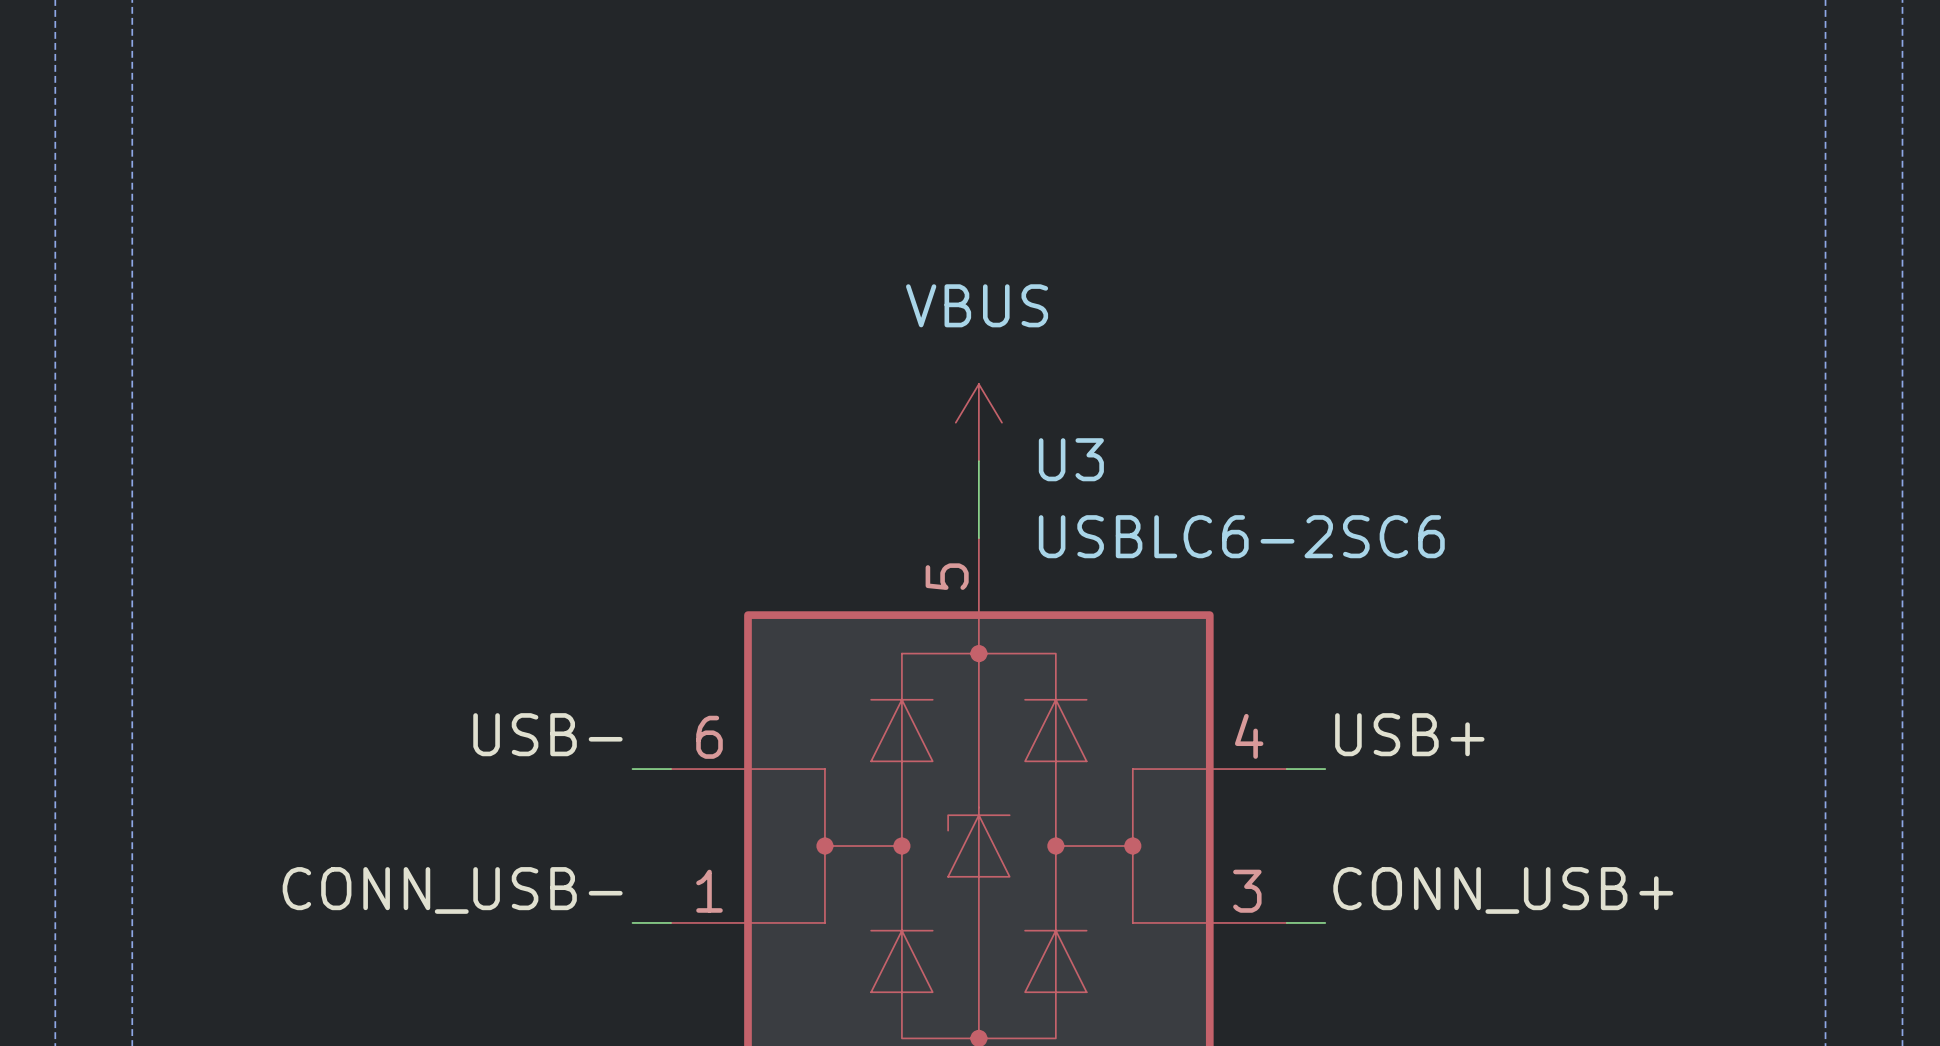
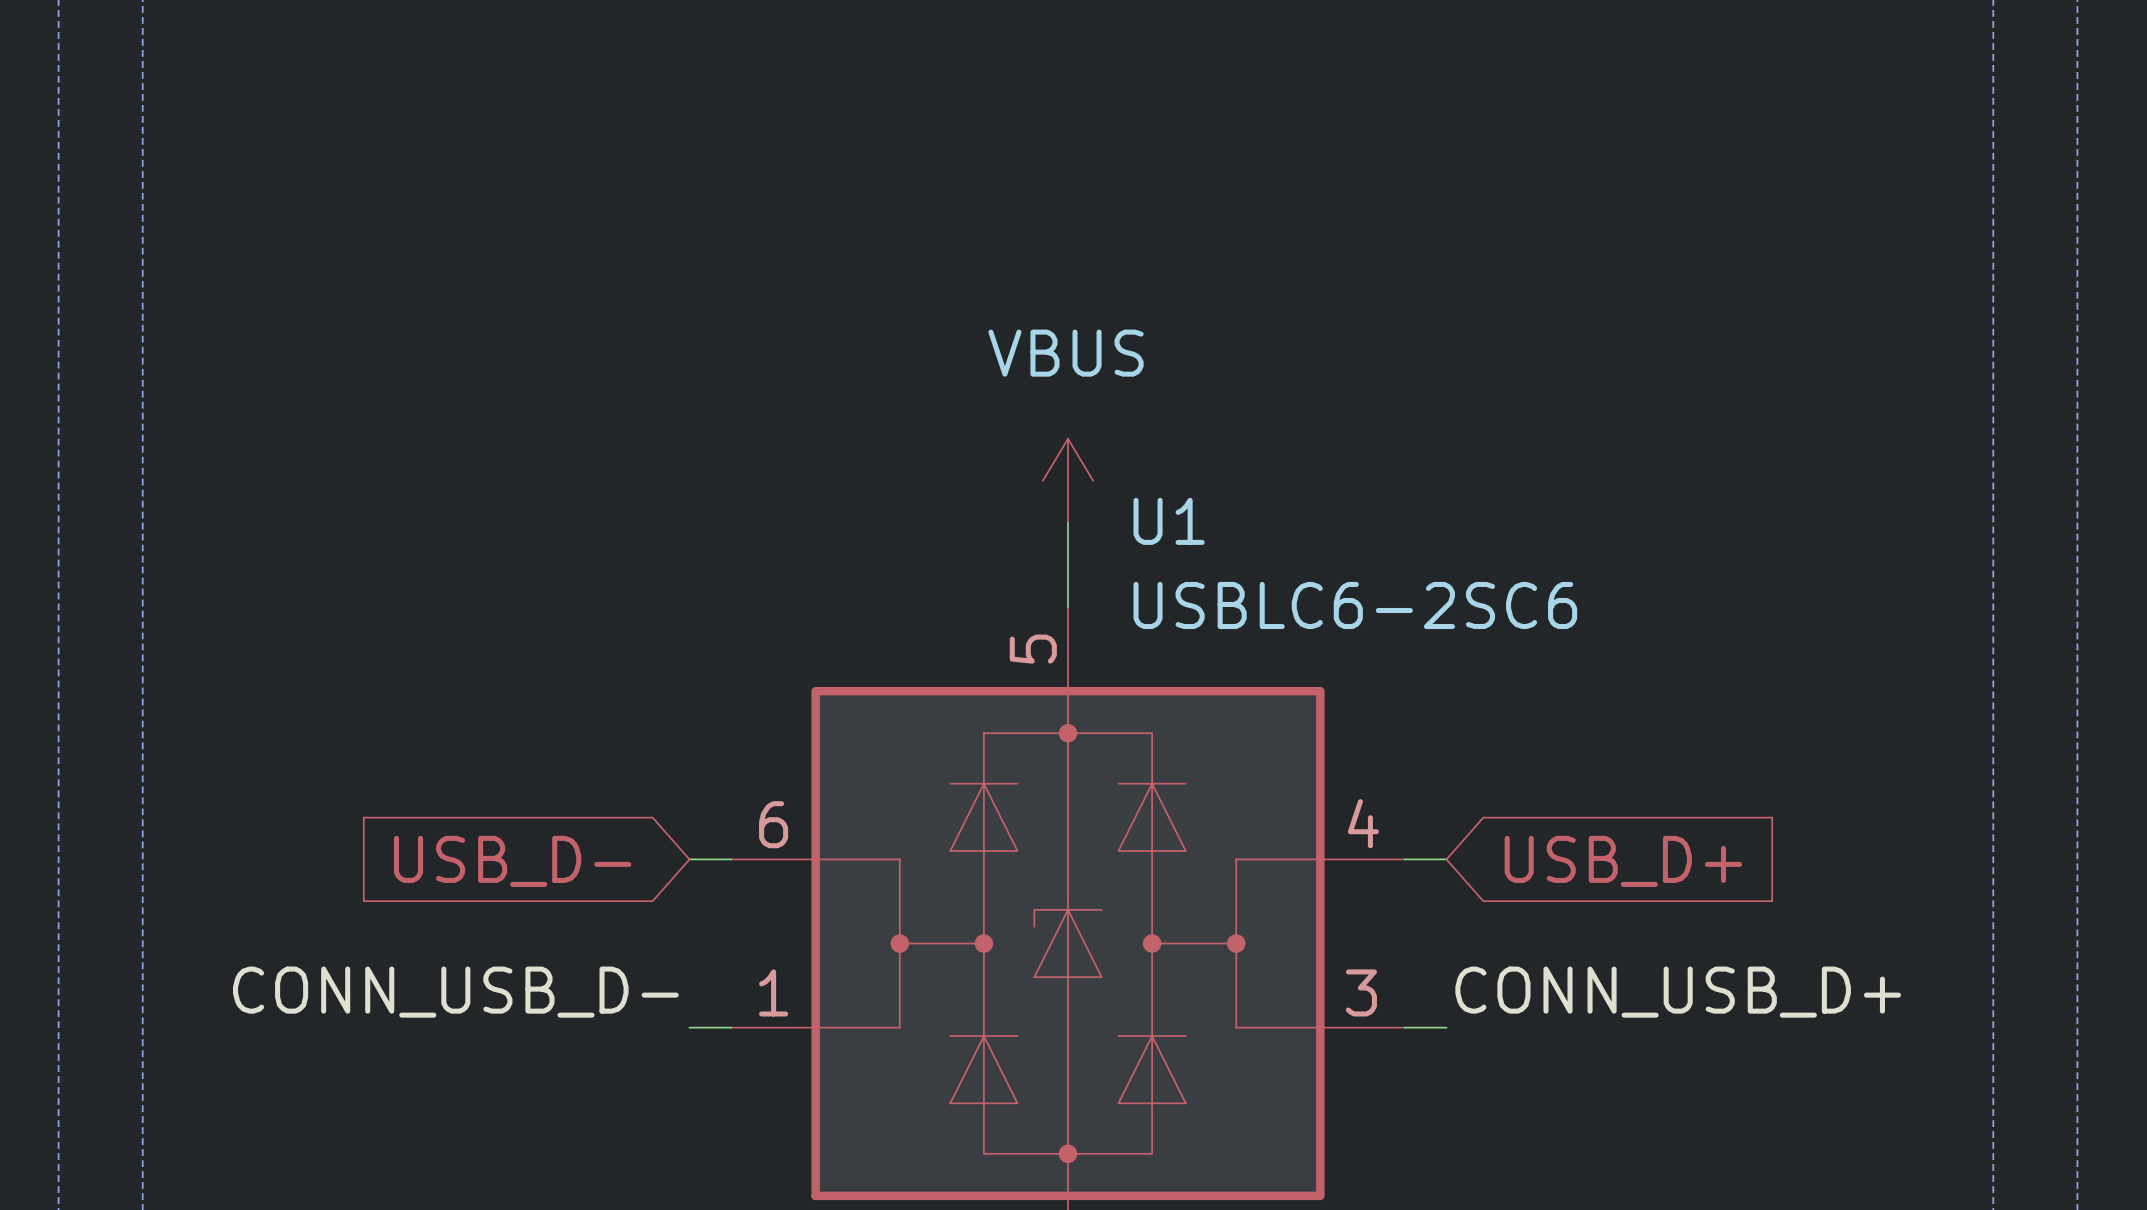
U3 name: U3 (1071, 459) -> U1 (1169, 521)
label: USB- (547, 734) -> none
label: USB+ (1409, 734) -> none
global label: none -> USB_D- (512, 861)
global label: none -> USB_D+ (1623, 861)
label: CONN_USB- (452, 890) -> CONN_USB_D- (455, 992)
label: CONN_USB+ (1503, 890) -> CONN_USB_D+ (1678, 992)

